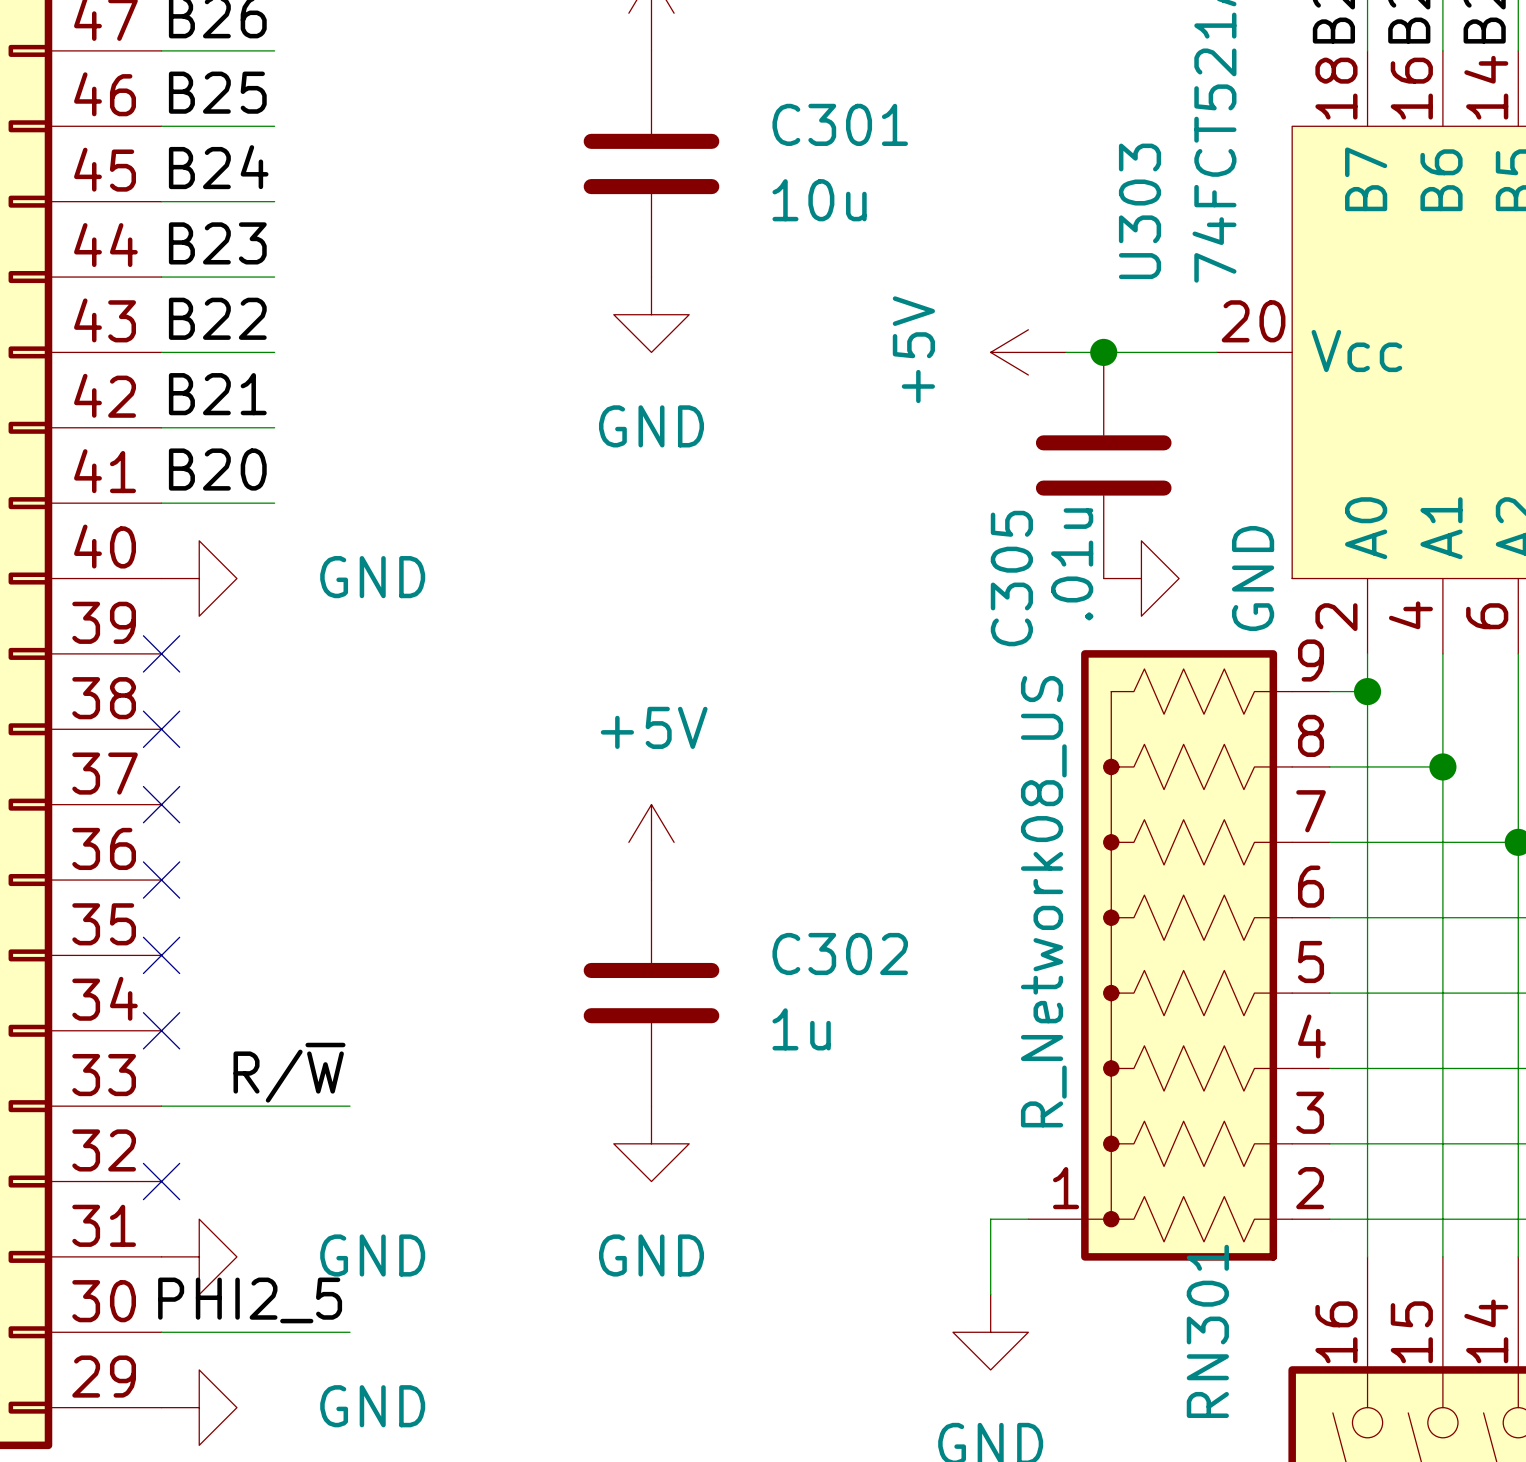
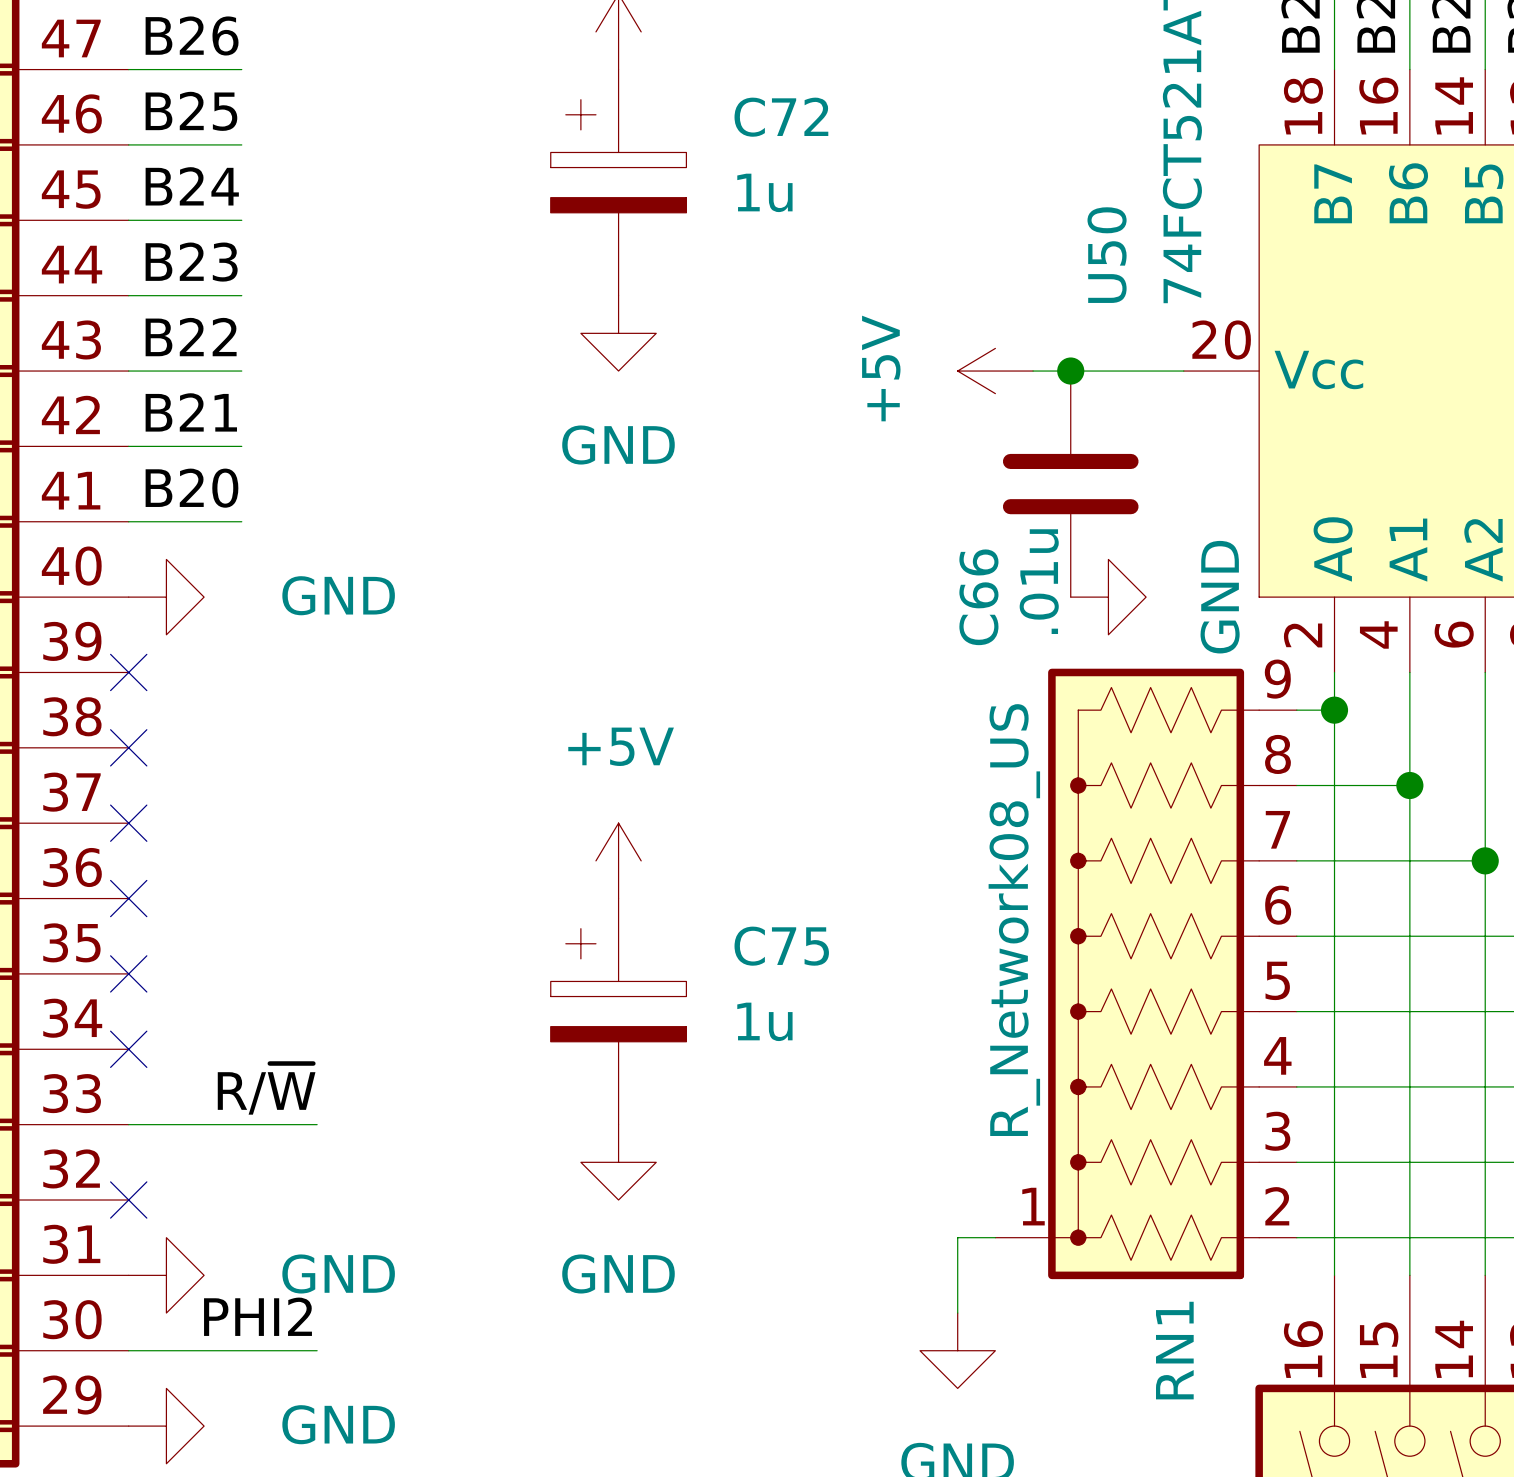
C301: 10u (651, 163) -> none
C72: none -> 1u (618, 182)
U303 name: U303 (1140, 211) -> U50 (1107, 255)
C305 name: C305 (1011, 578) -> C66 (978, 597)
C302: 1u (651, 993) -> none
C75: none -> 1u (618, 1011)
label: PHI2_5 (250, 1300) -> PHI2 (258, 1316)
RN301 name: RN301 (1207, 1331) -> RN1 (1174, 1350)

